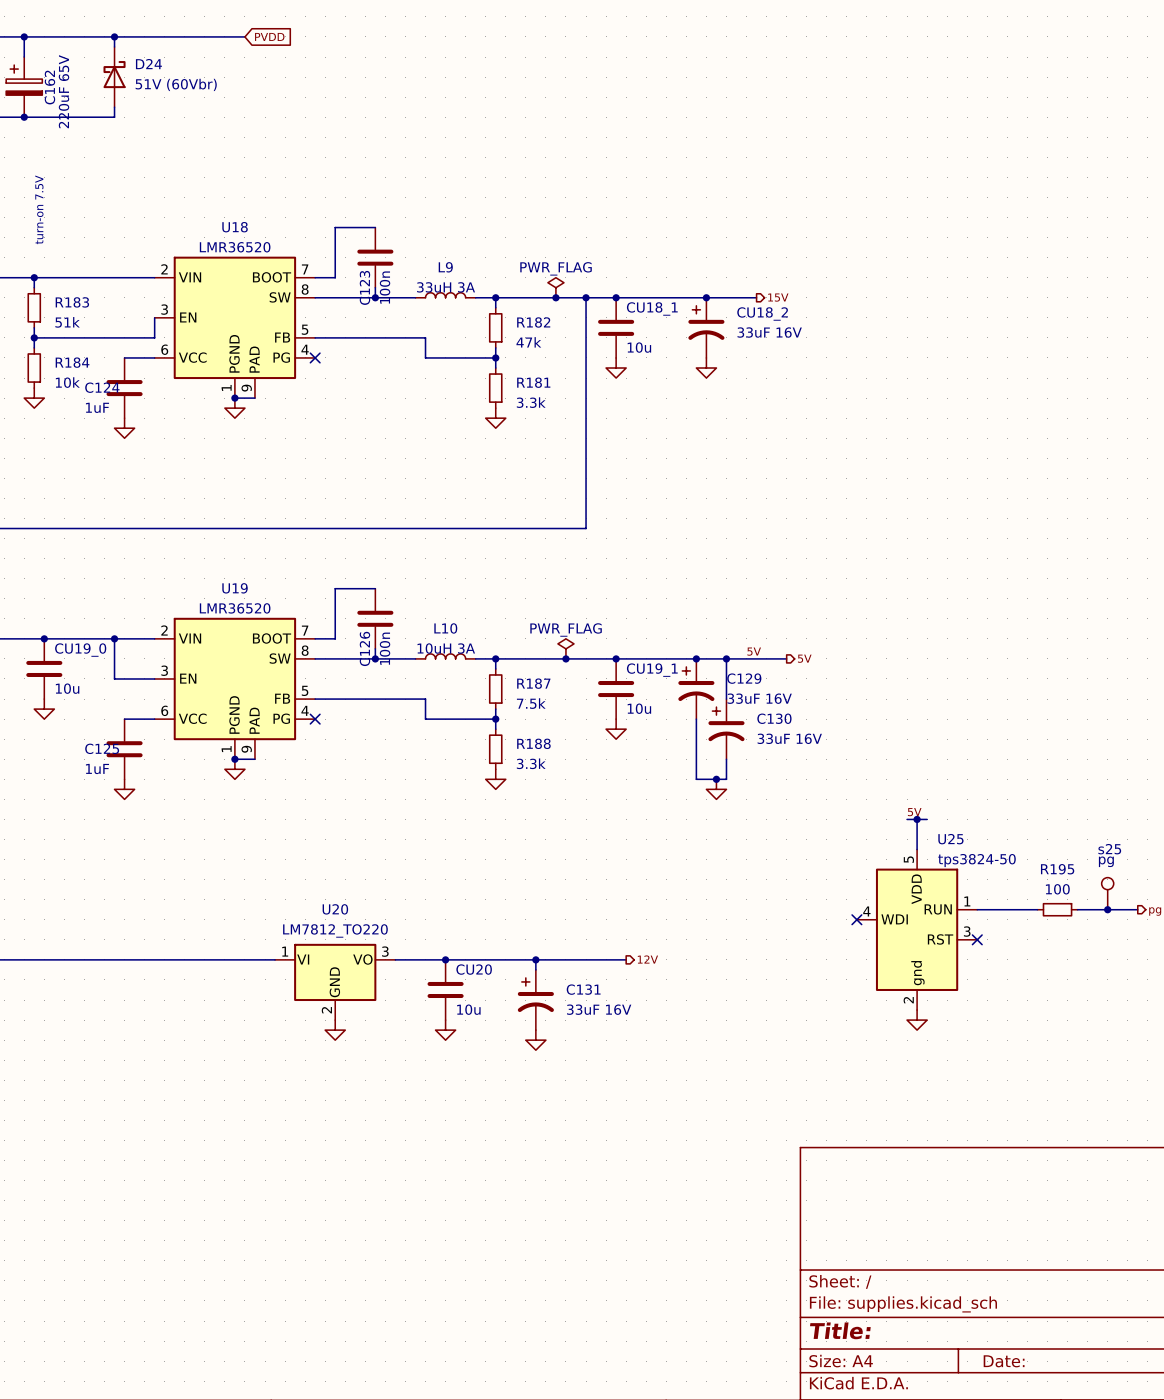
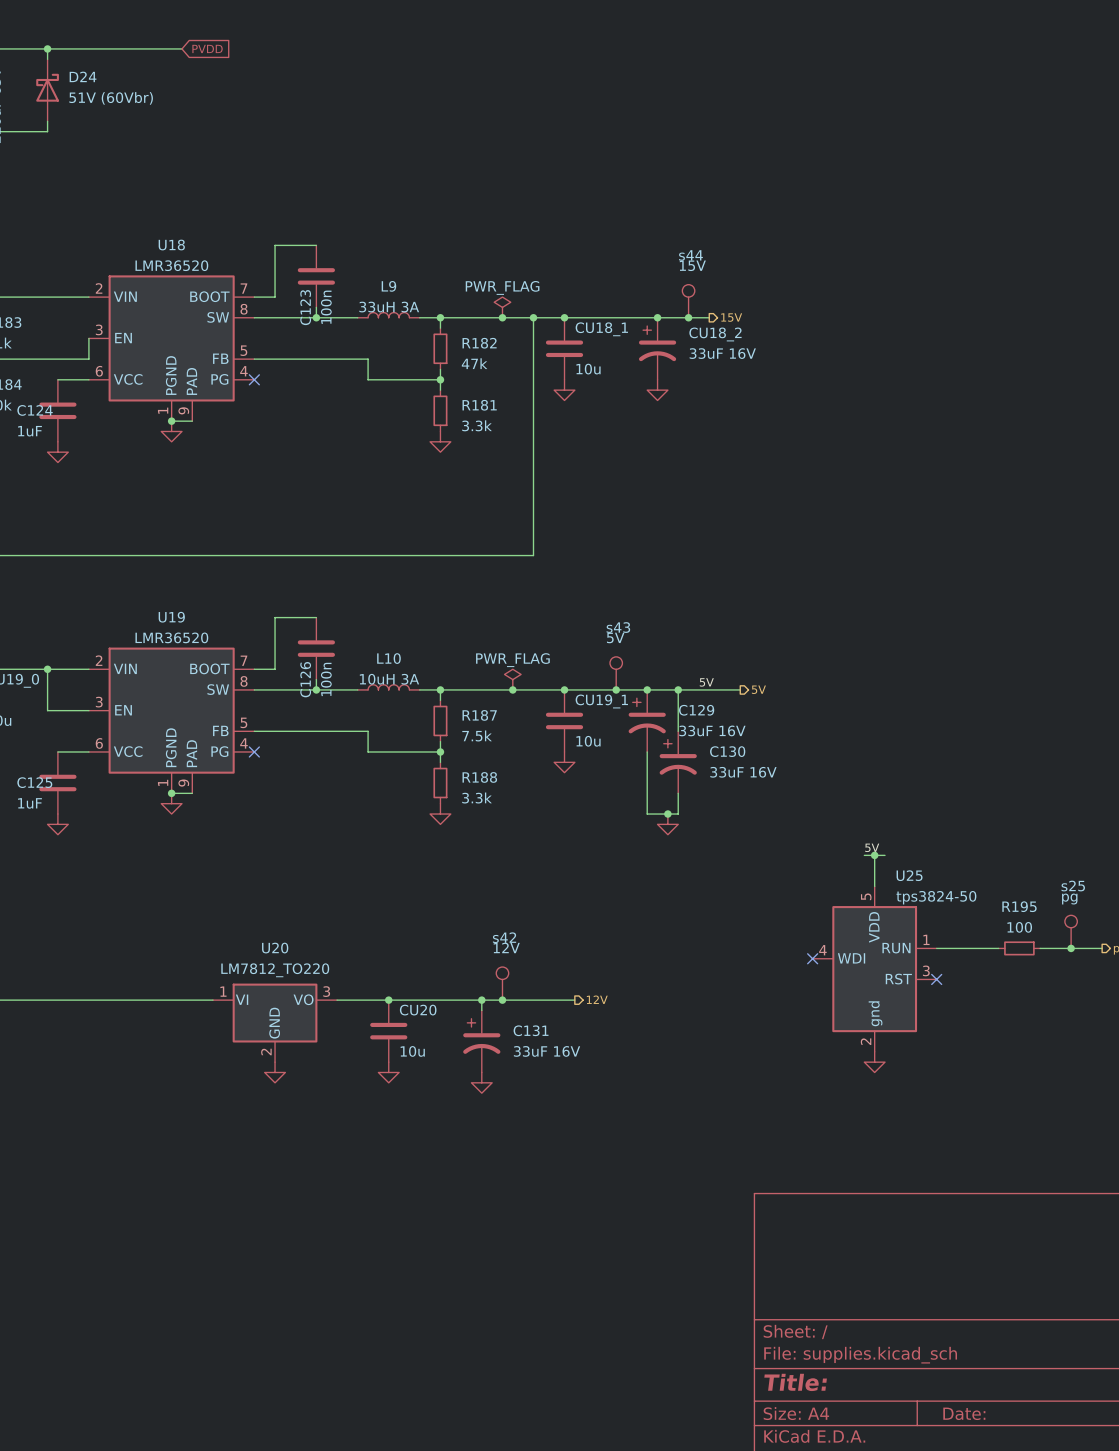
s44: none -> 15V (688, 301)
junction: none -> (688, 317)
s43: none -> 5V (616, 673)
junction: none -> (616, 689)
s42: none -> 12V (502, 983)
junction: none -> (502, 1000)

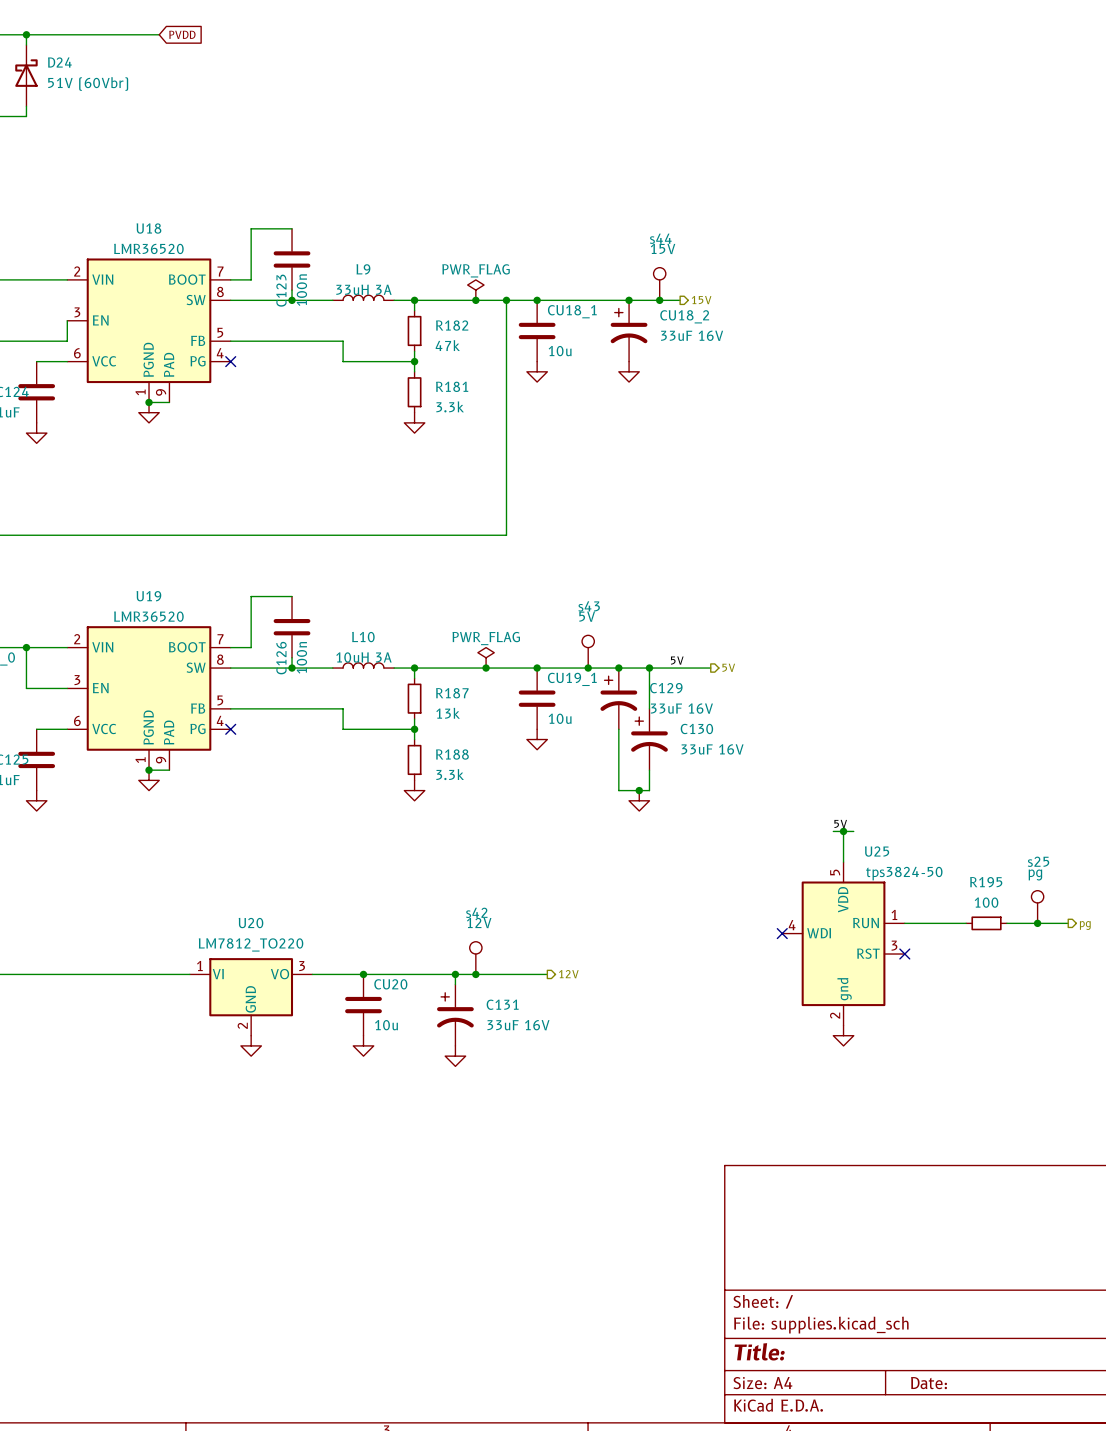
R187 value: 7.5k (477, 735) -> 13k (448, 713)

